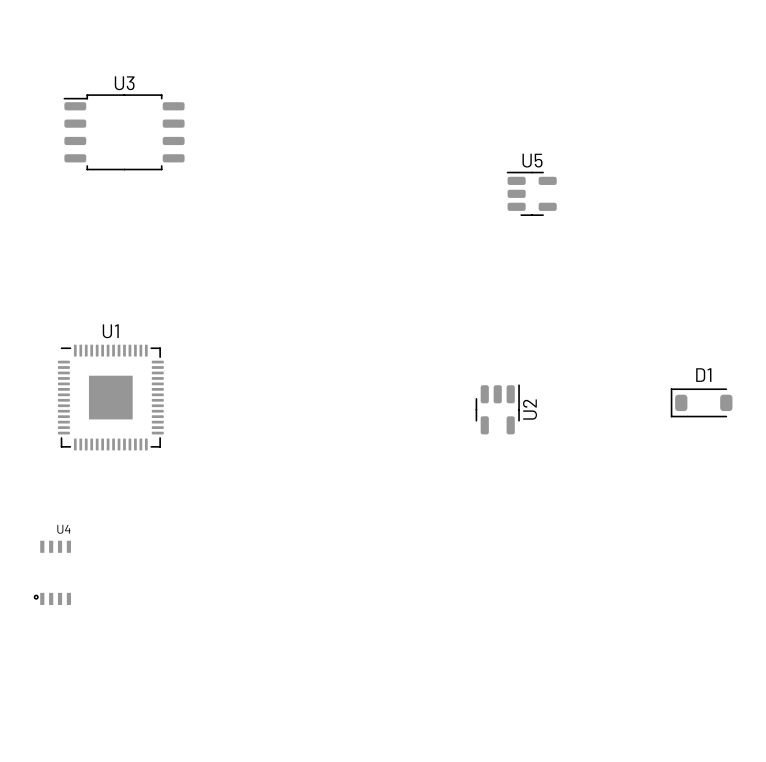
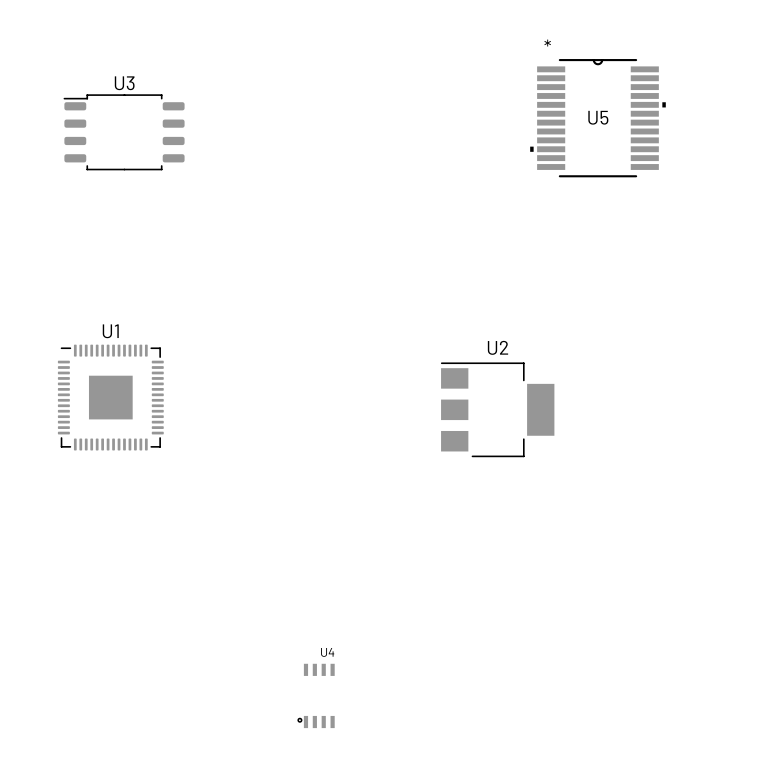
U5 name position: U5 (532, 160) -> U5 (598, 117)
U5 footprint: [506, 171, 557, 216] -> [530, 59, 666, 178]
U2 footprint: [475, 384, 520, 435] -> [440, 362, 555, 458]
D1: (701, 402) -> none
U2 name position: U2 (529, 409) -> U2 (498, 347)
U4 position: (52, 572) -> (316, 695)

